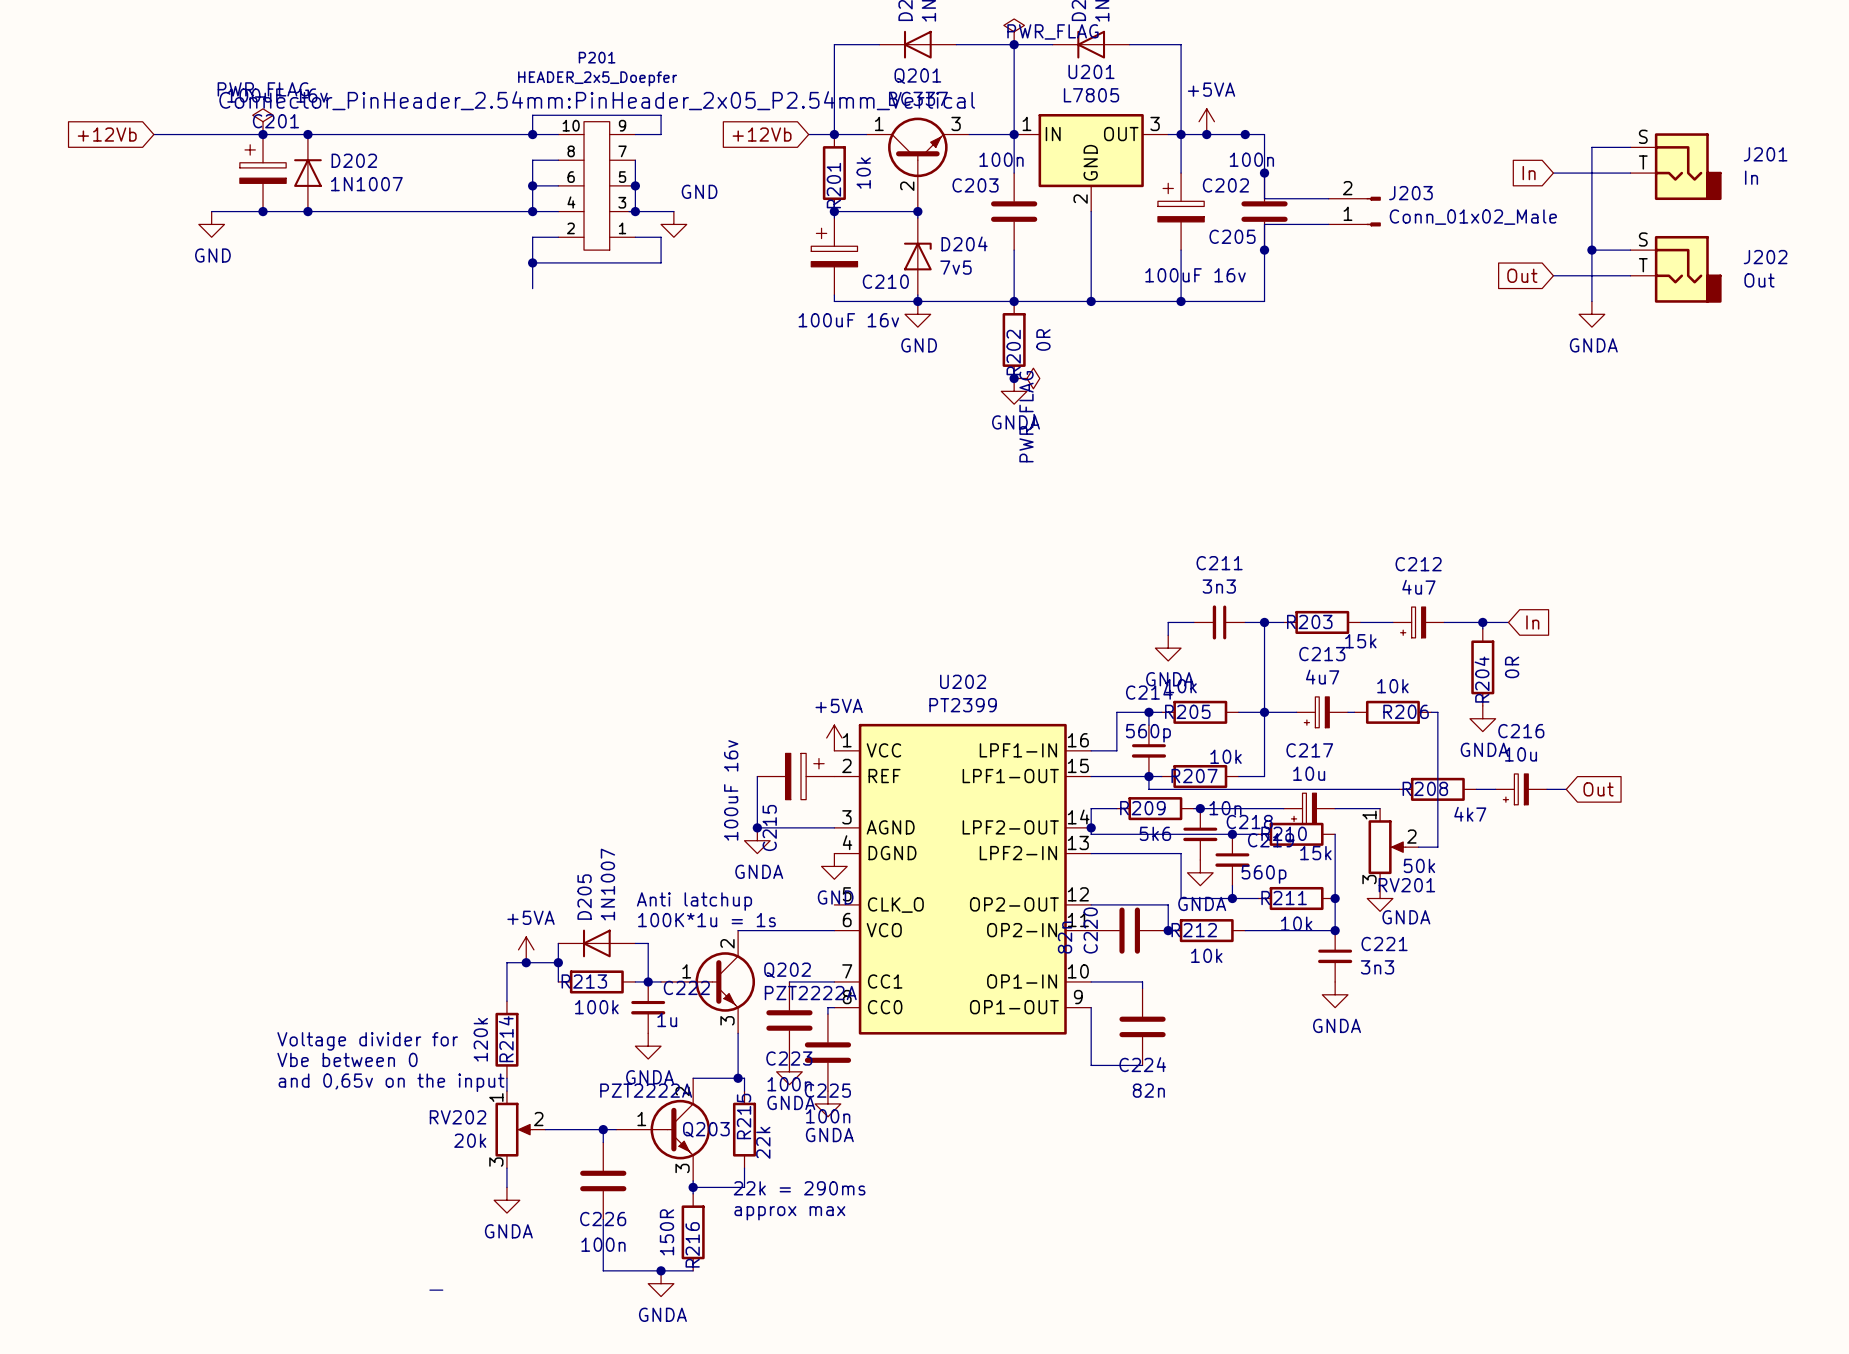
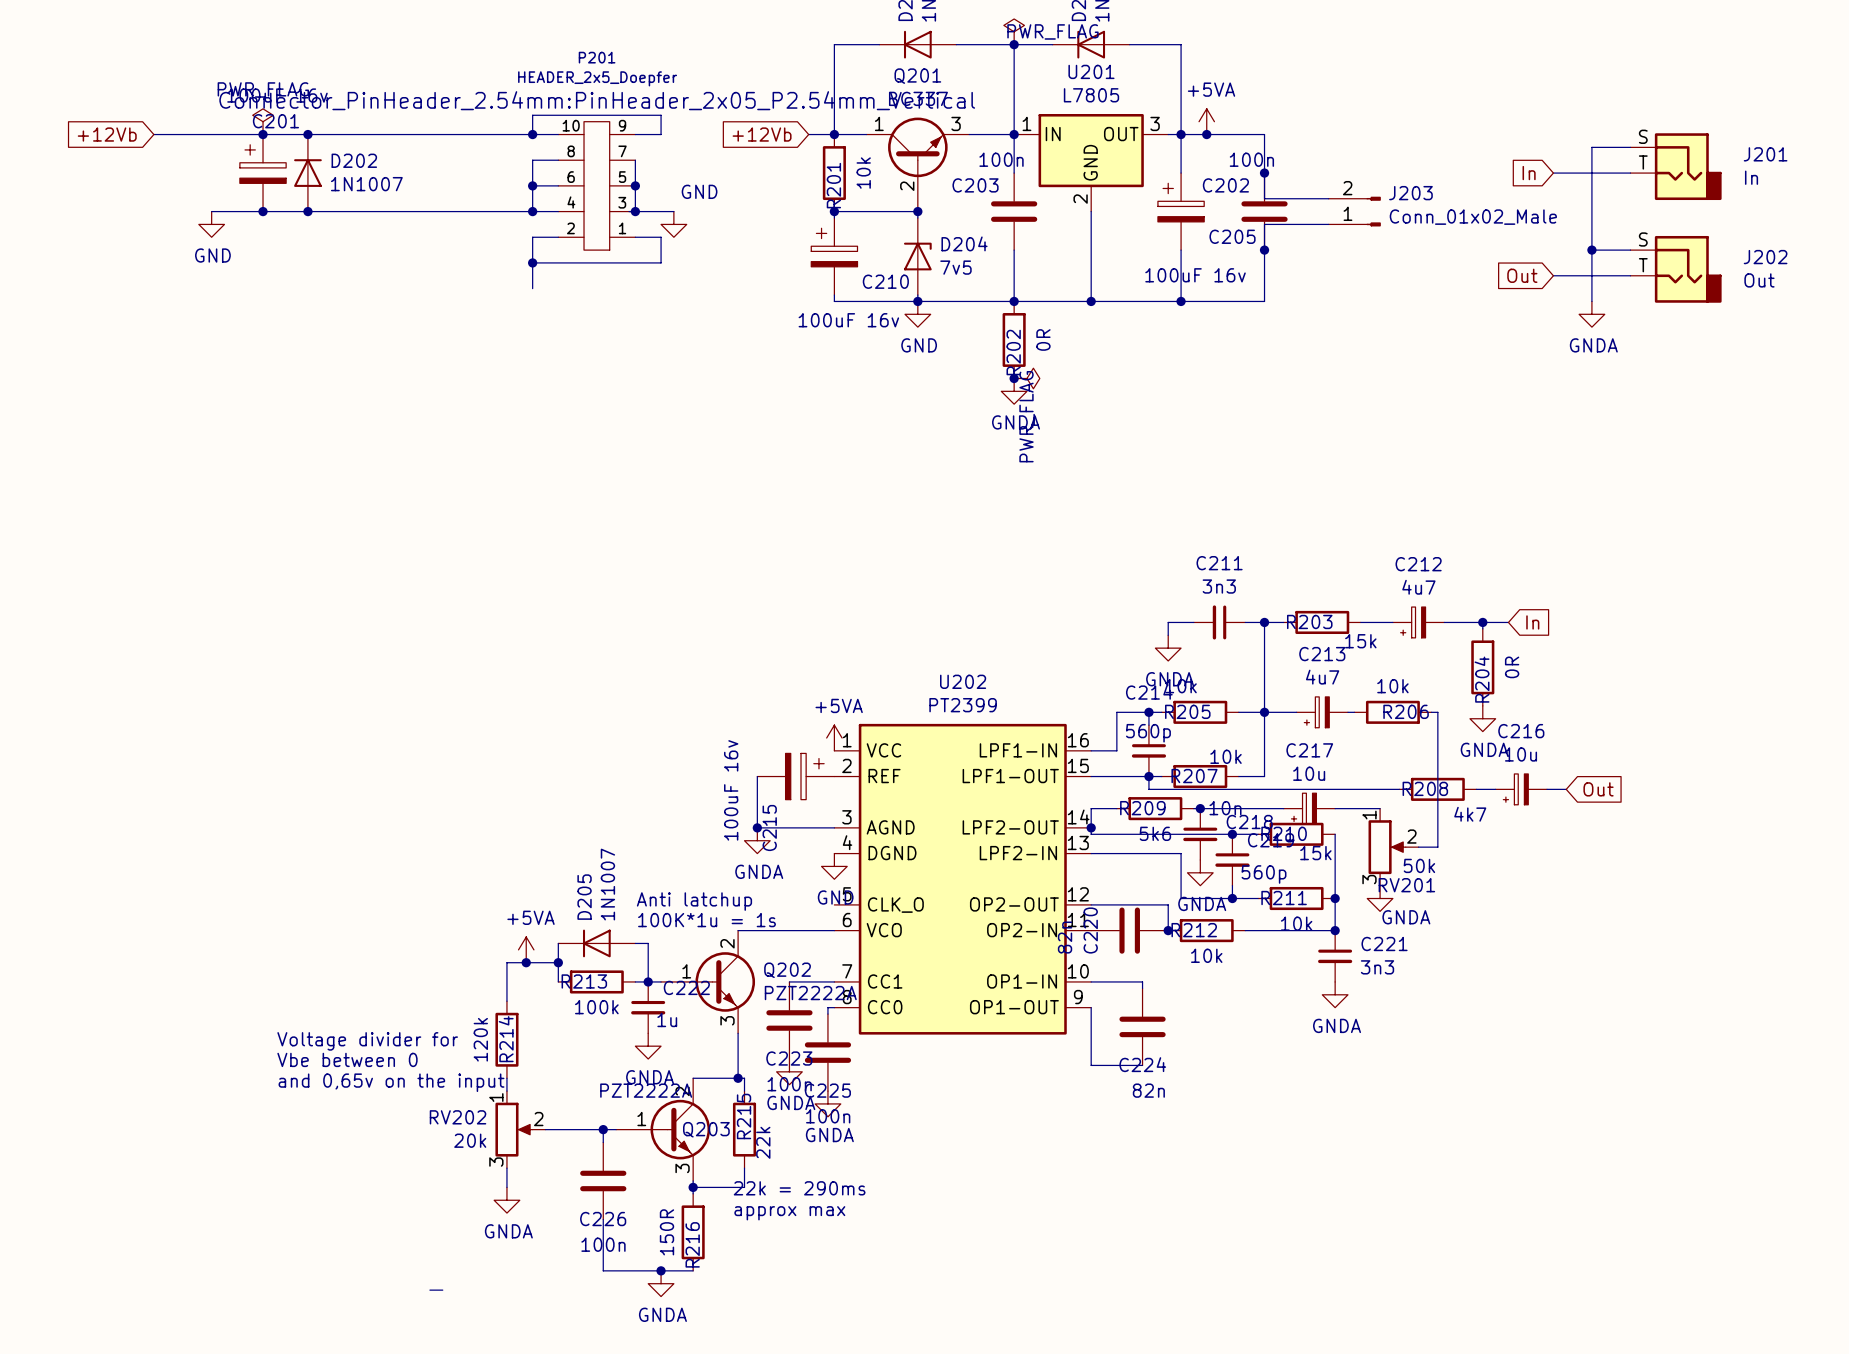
junction: (1245, 134) -> none

